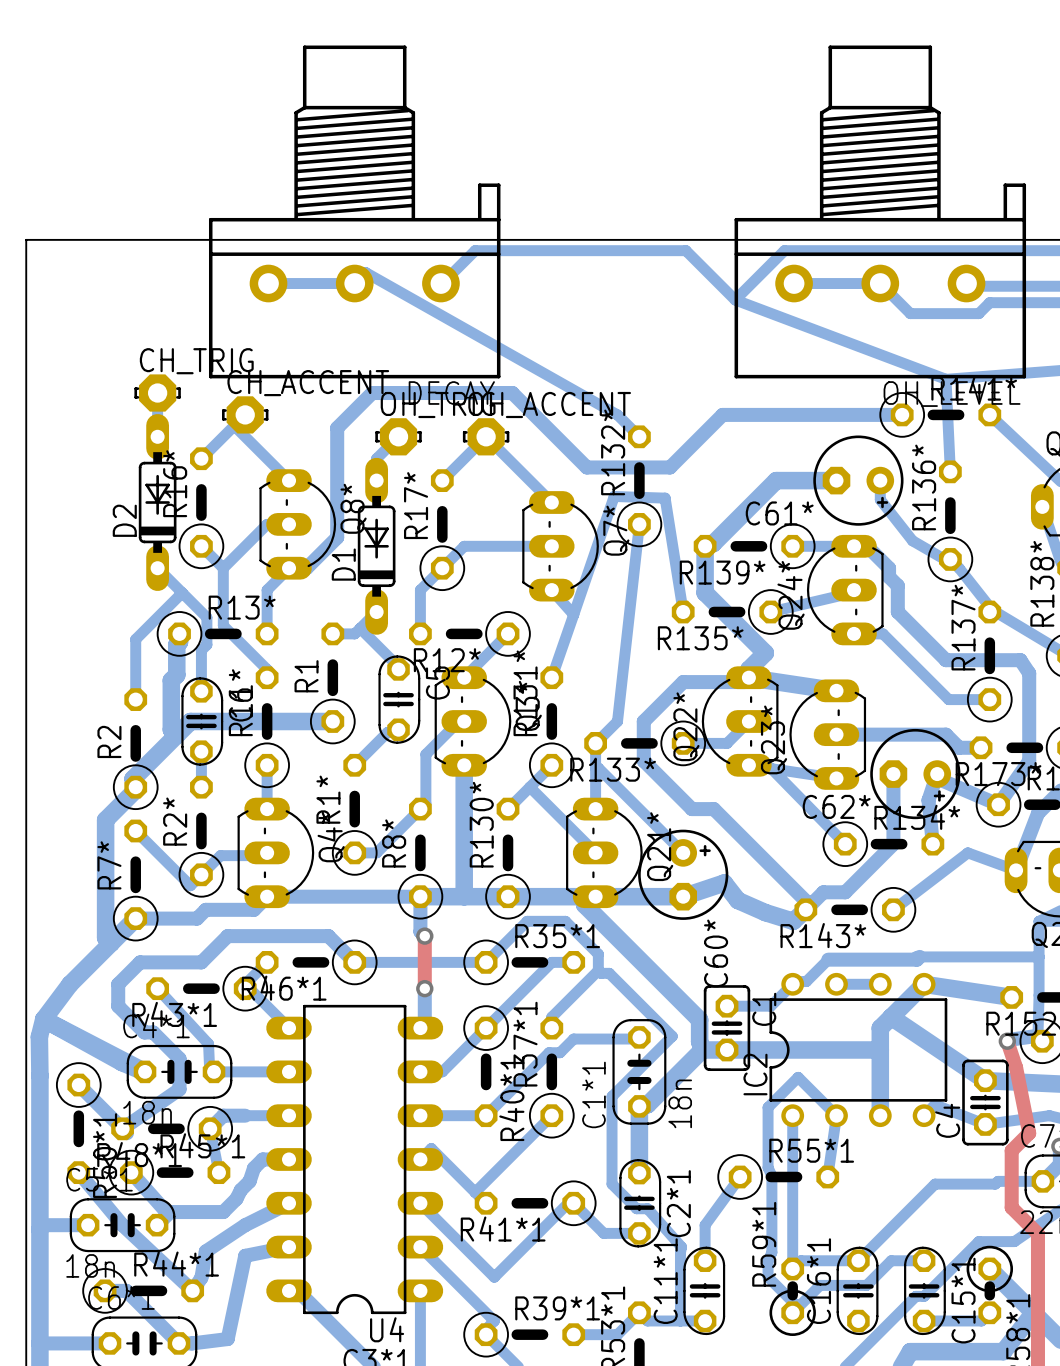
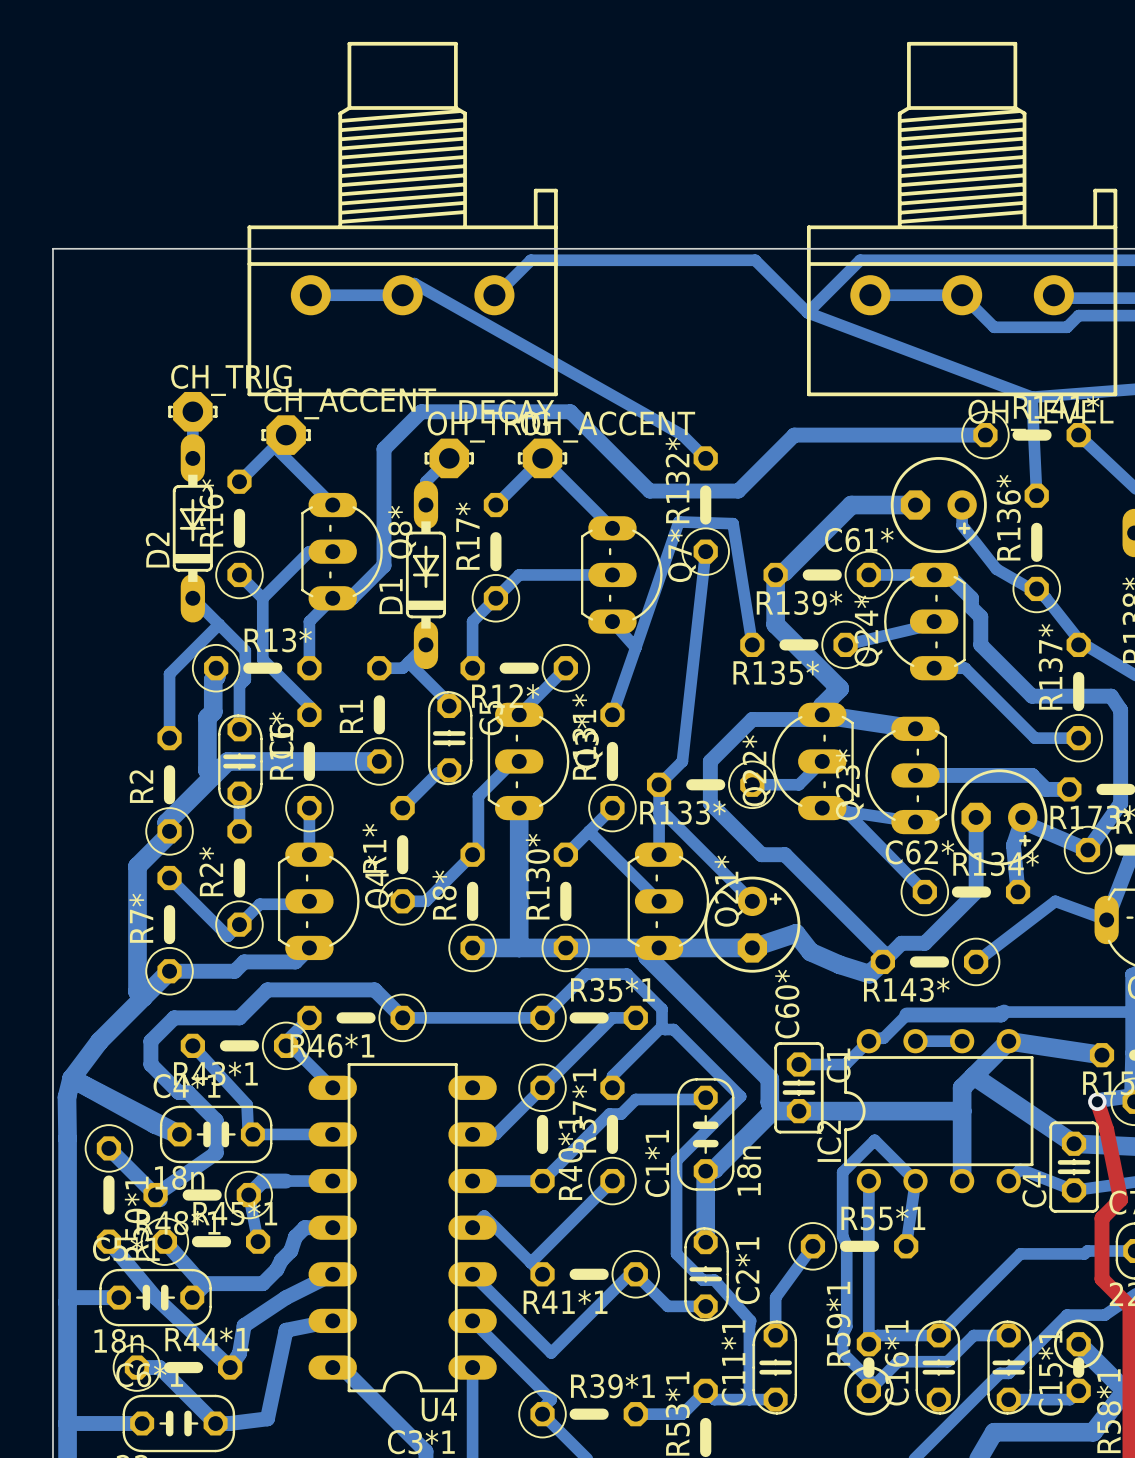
bottom track: (267, 896) (420, 896) (420, 931) (424, 936) -> none
top track: (424, 936) (424, 988) -> none
via: (424, 936) -> none
bottom track: (424, 988) (424, 1023) (420, 1028) -> none
via: (424, 988) -> none

